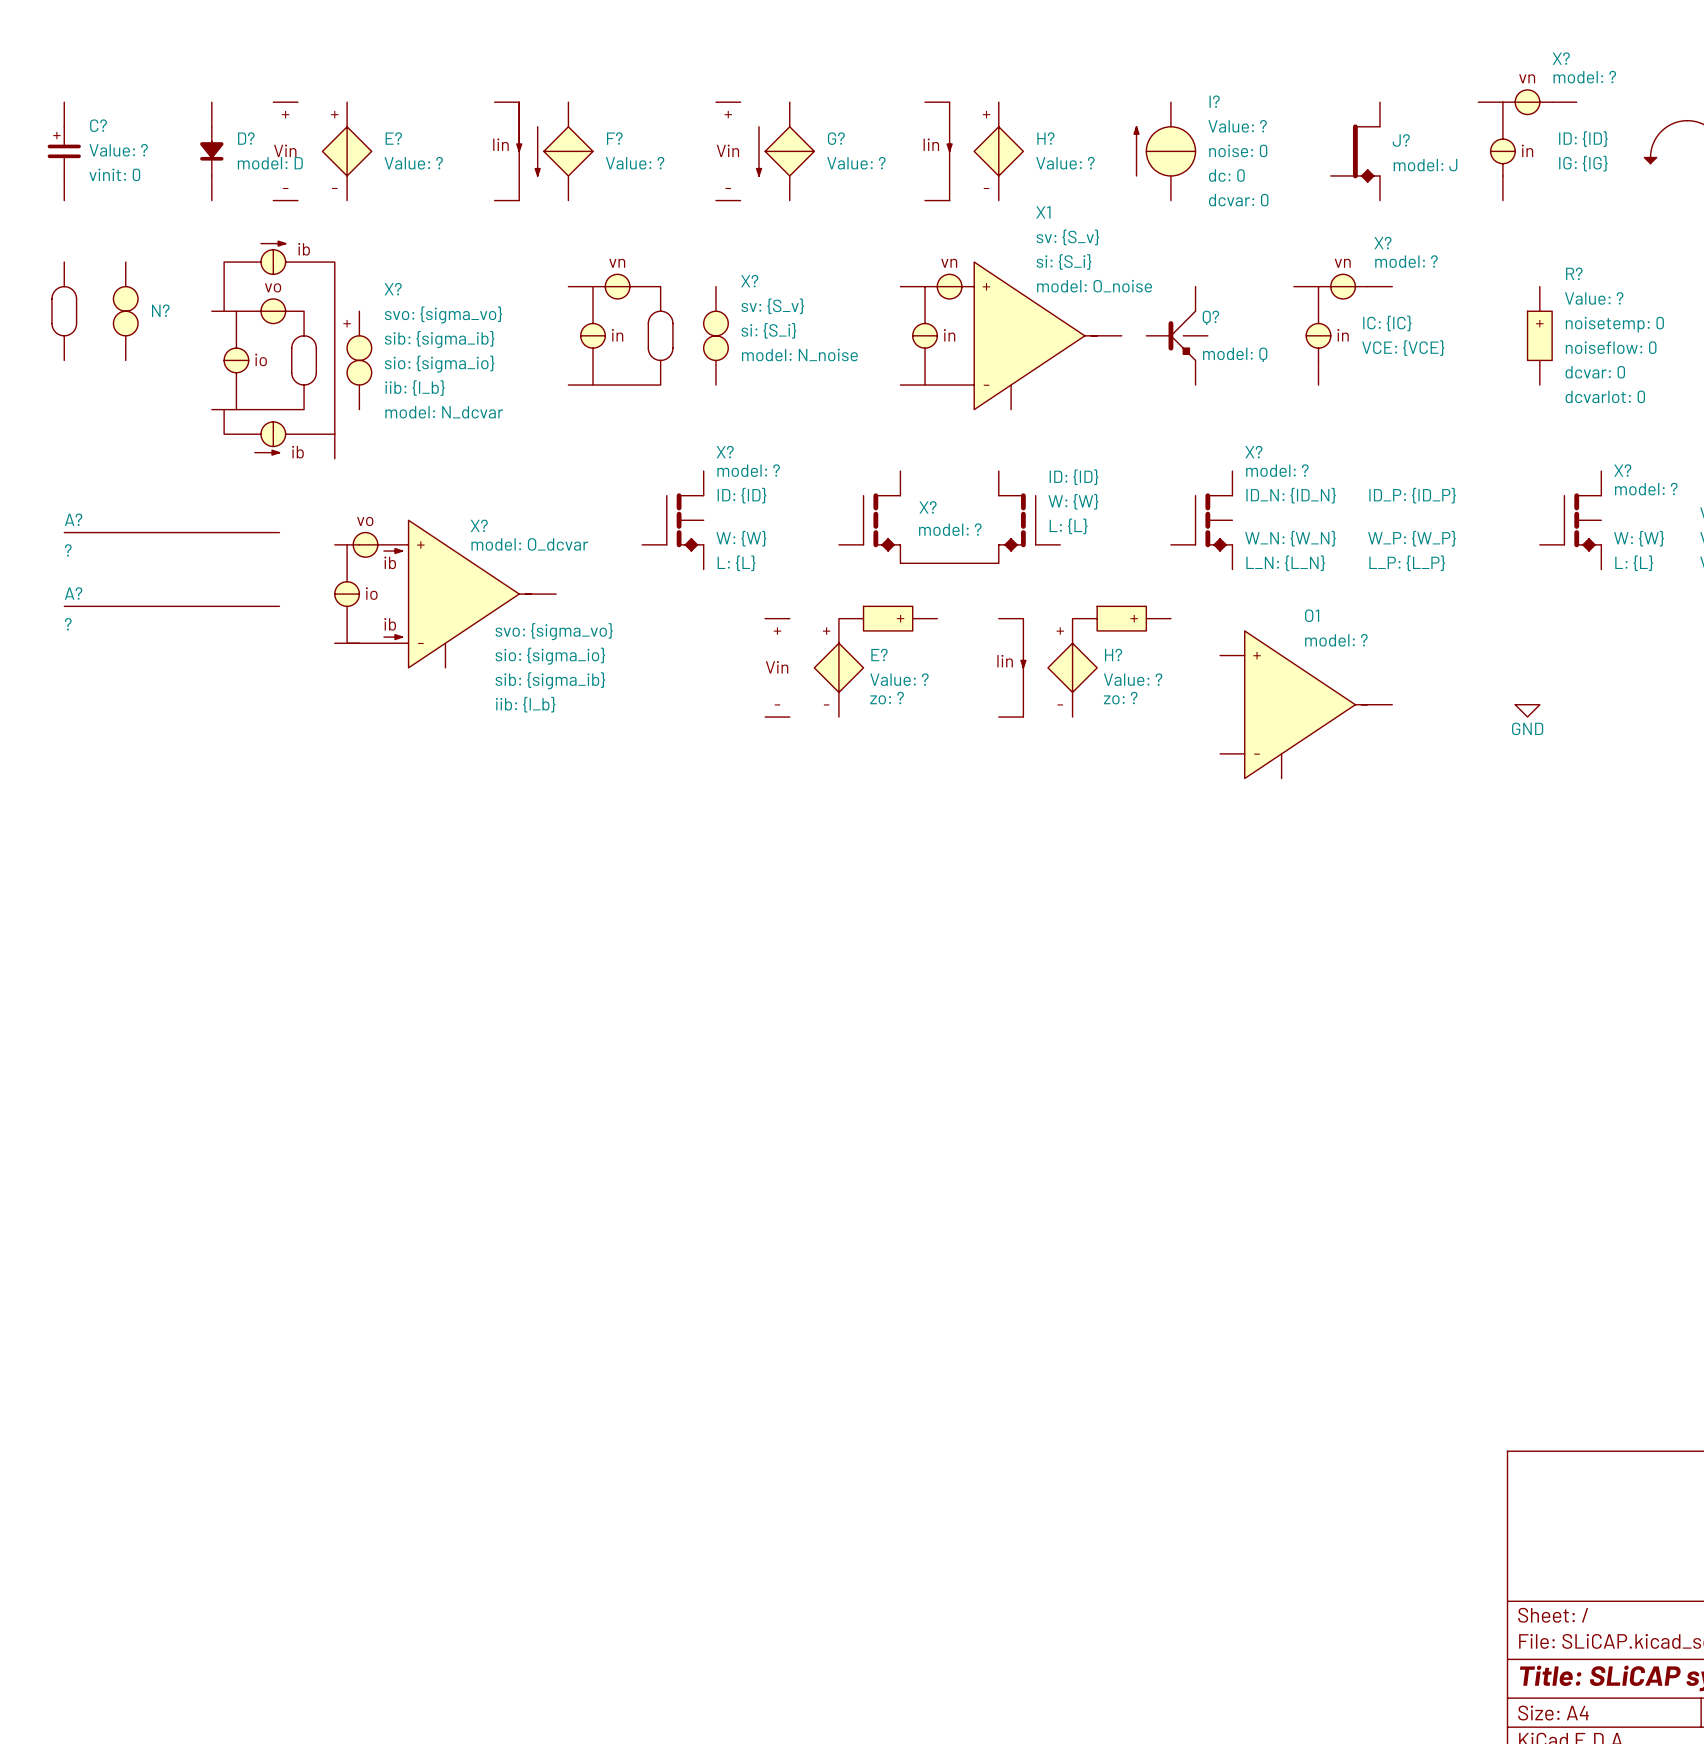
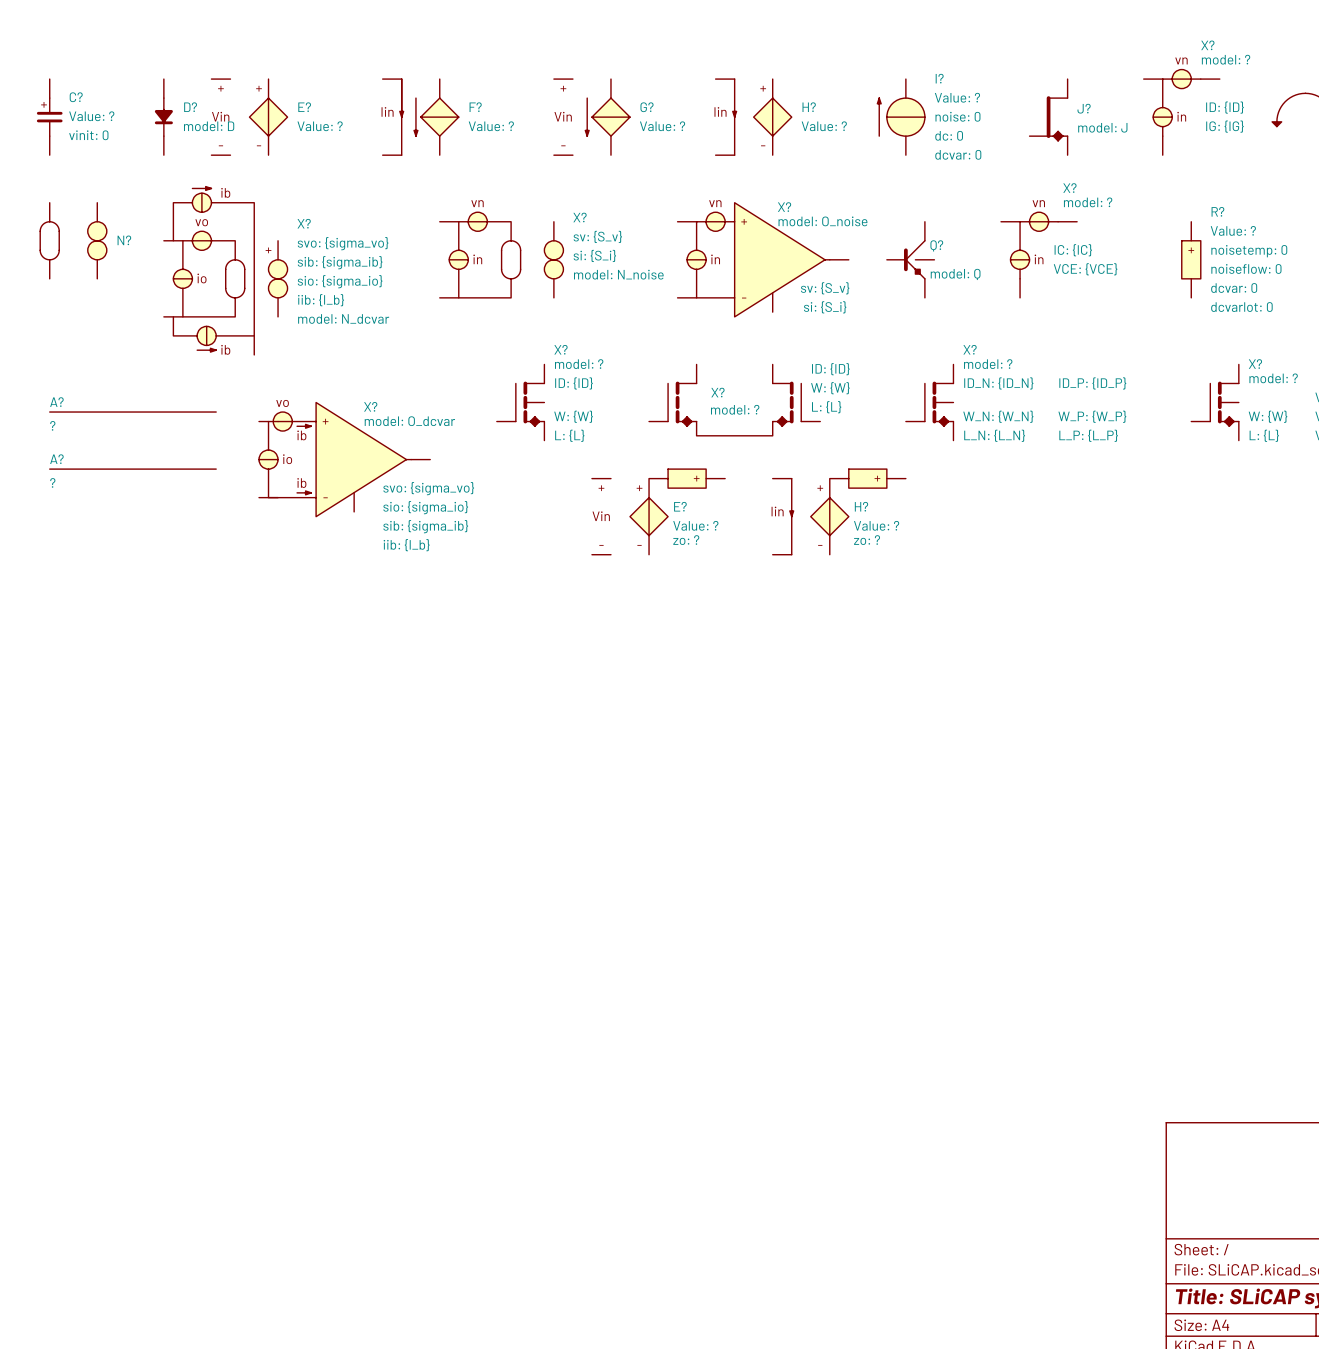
X? symbol: [211, 241, 372, 459] -> [163, 186, 288, 355]
X?: none -> (763, 259)
X1: (1011, 335) -> none
X? symbol: [334, 520, 557, 668] -> [259, 402, 431, 517]
O1: (1306, 704) -> none
power symbol: GND (1527, 710) -> none

